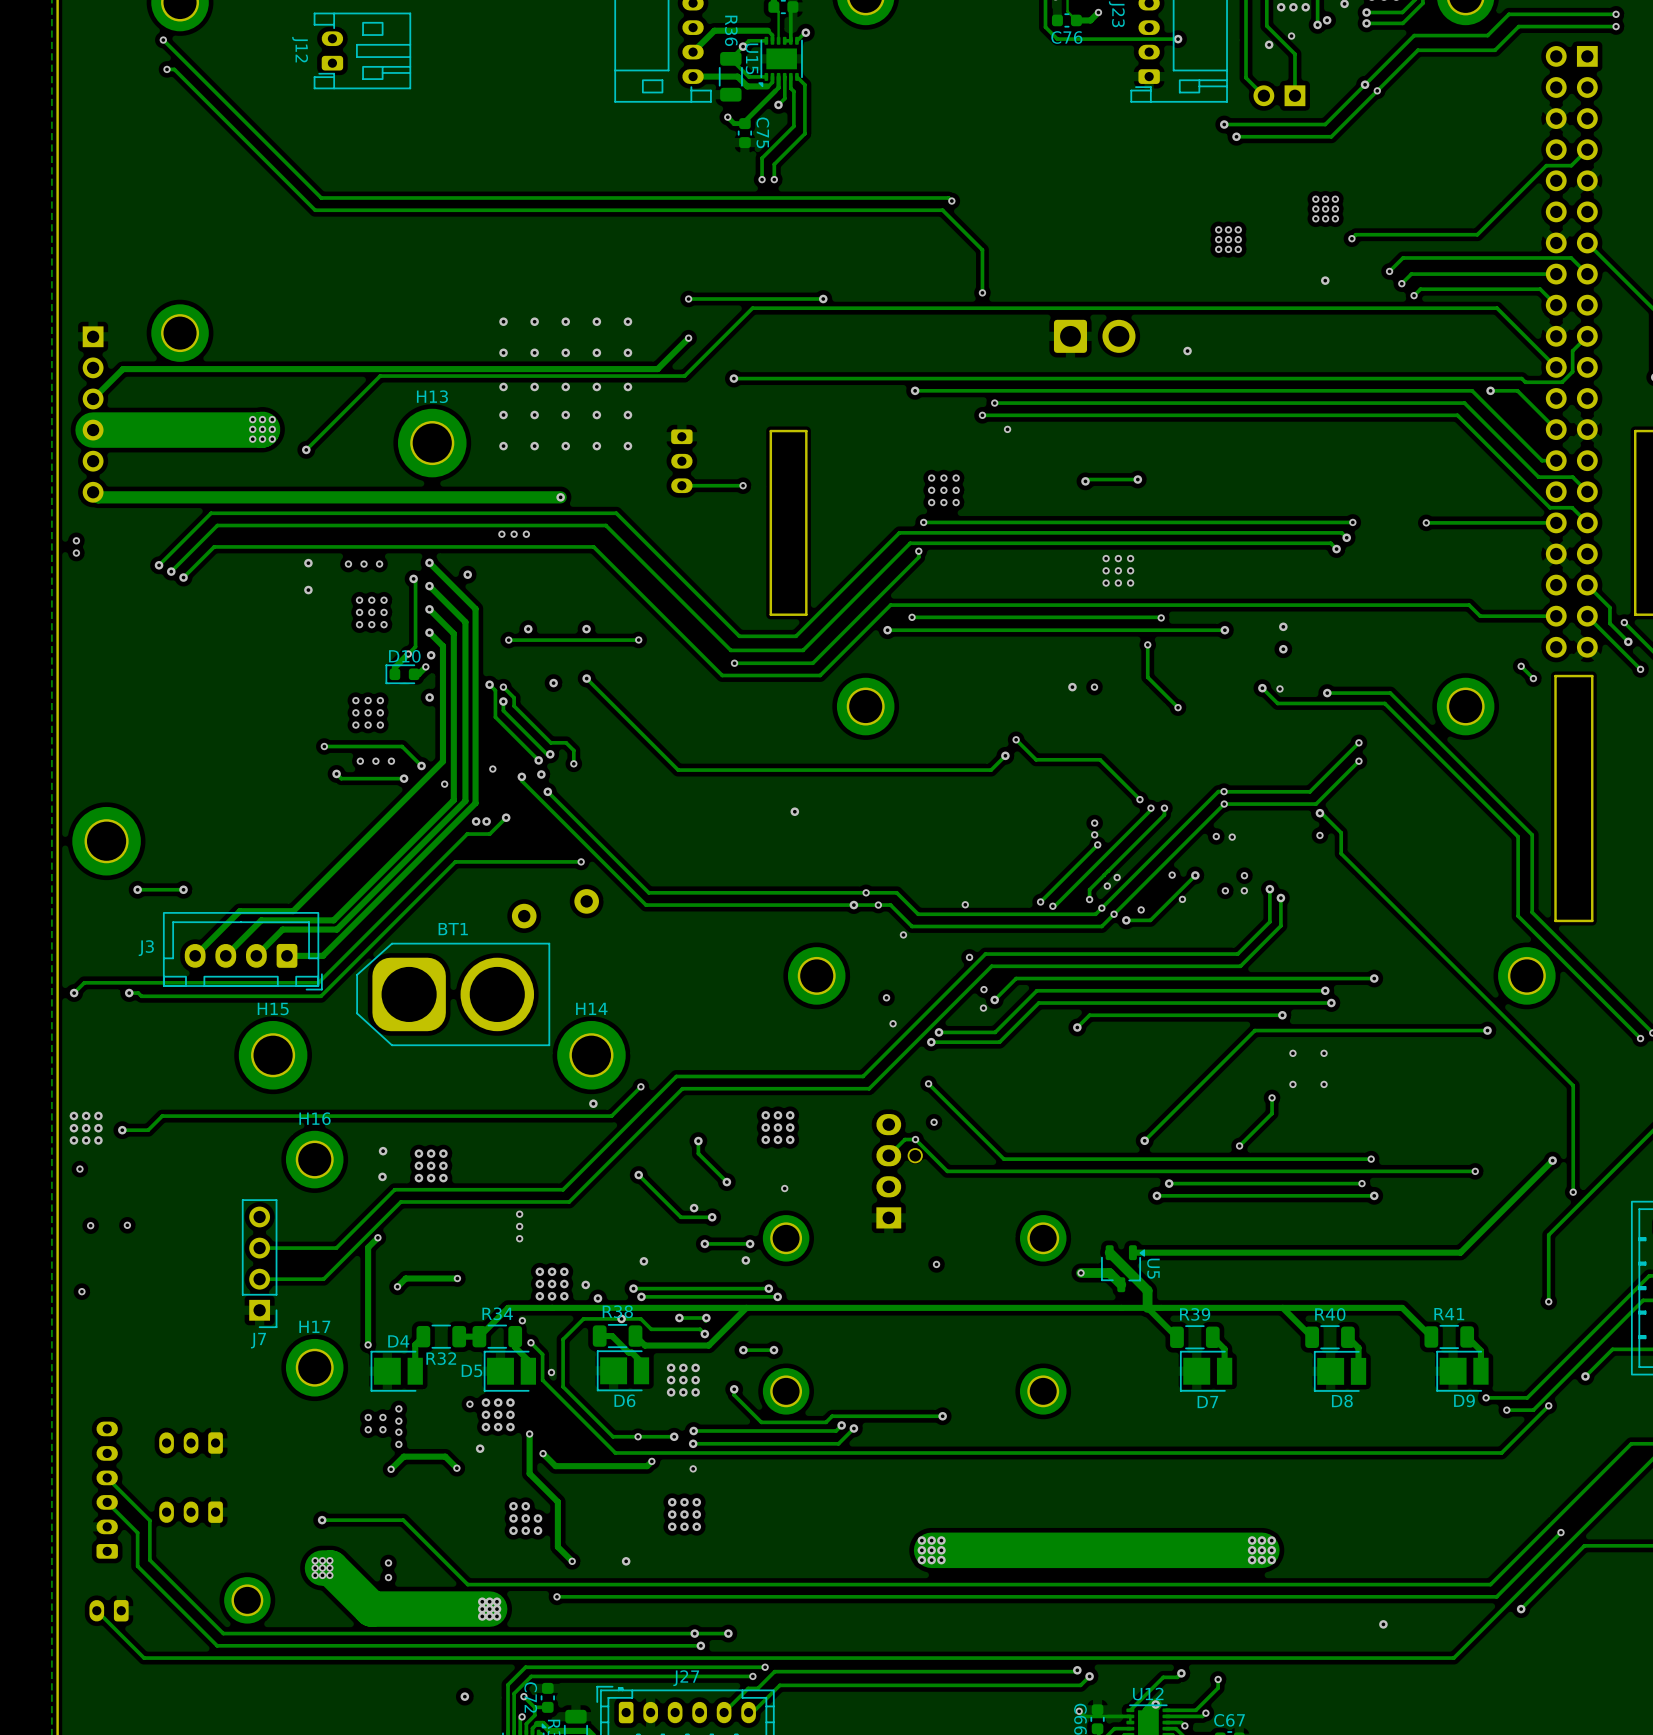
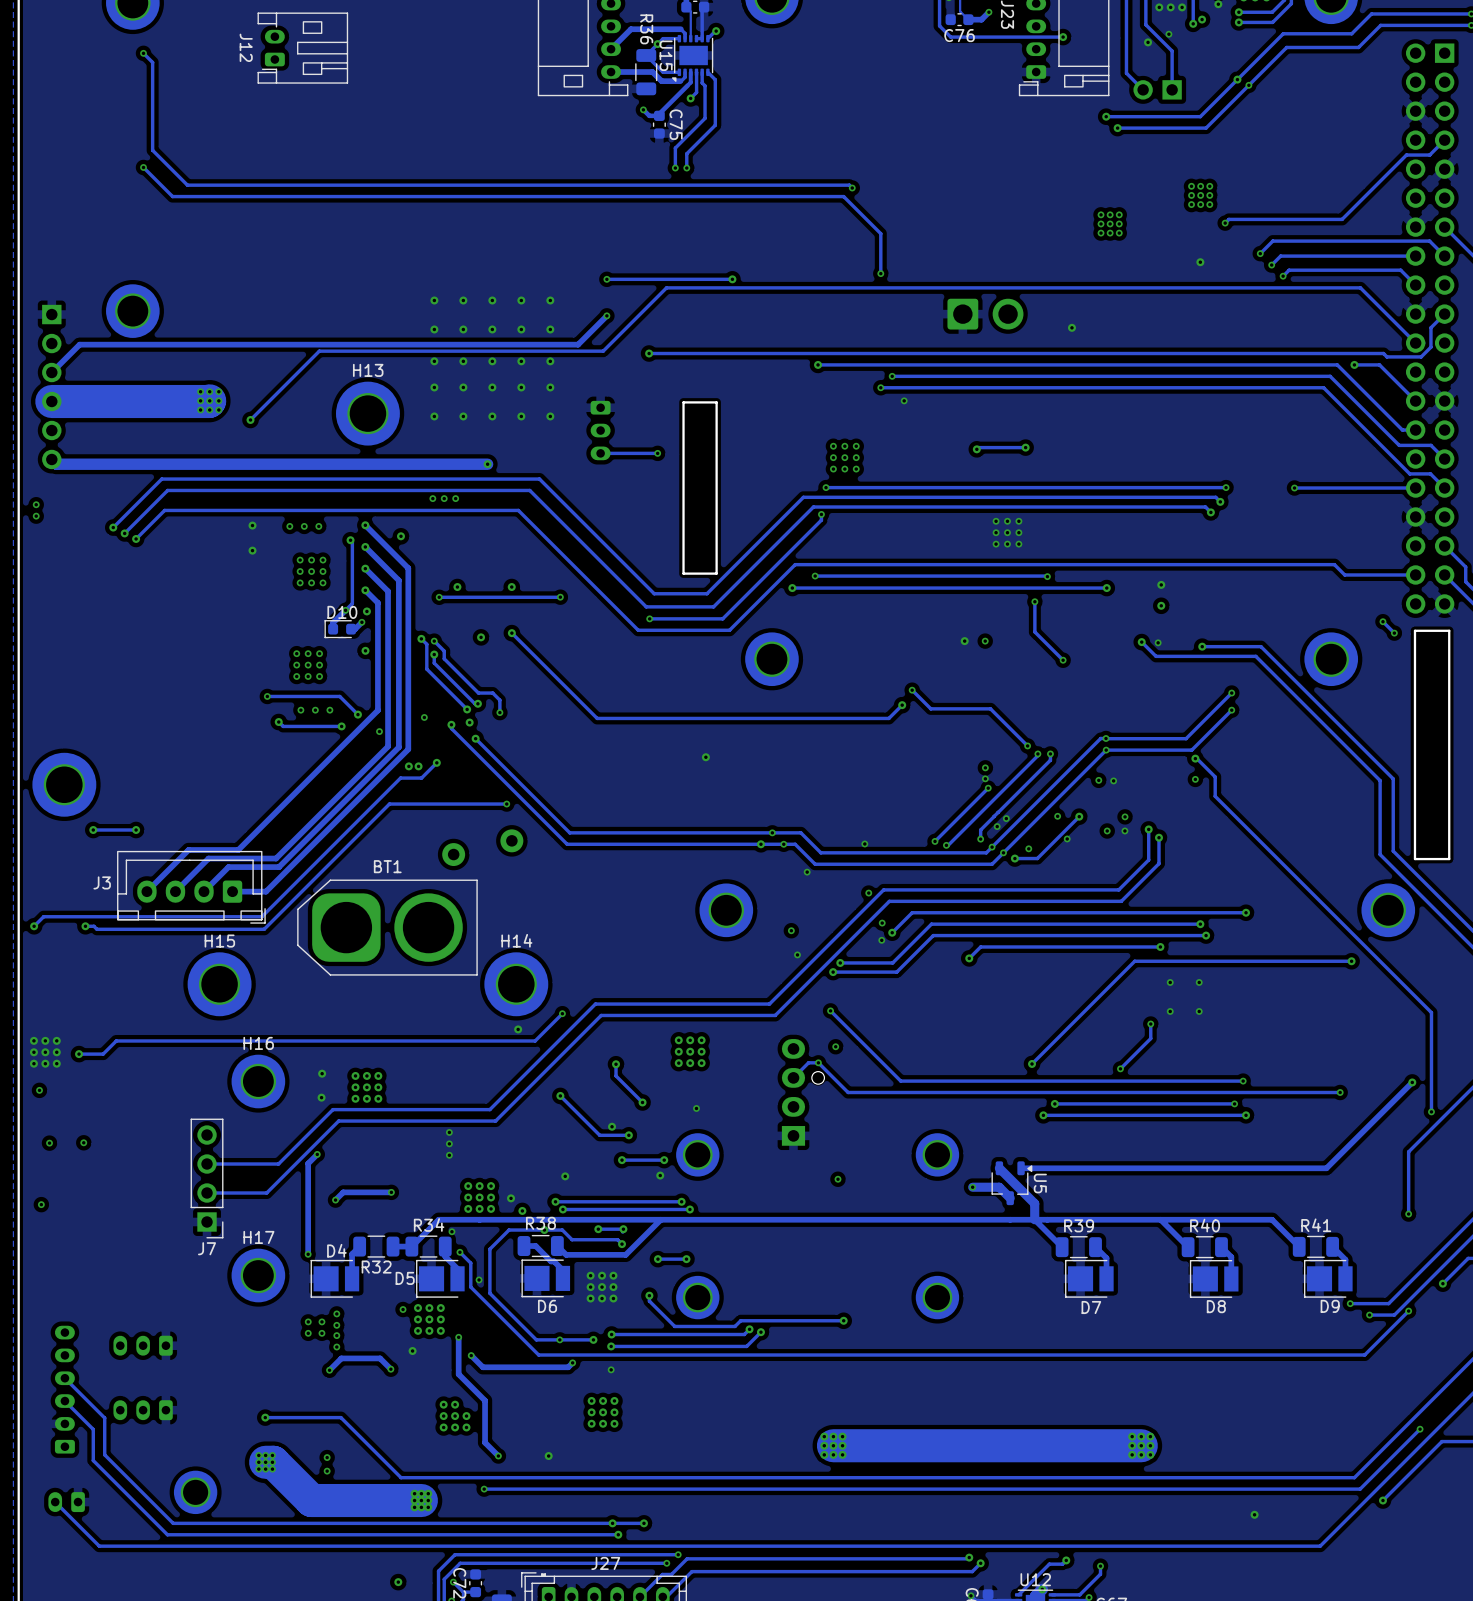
track: (163, 40) (321, 197) -> (143, 53) (152, 62) (152, 150) (187, 185) (264, 185)
via: (163, 40) -> none
via: none -> (143, 53)
track: (167, 69) (174, 69) (315, 210) -> (143, 167) (172, 196) (258, 196)
via: (167, 69) -> none
via: none -> (143, 167)

